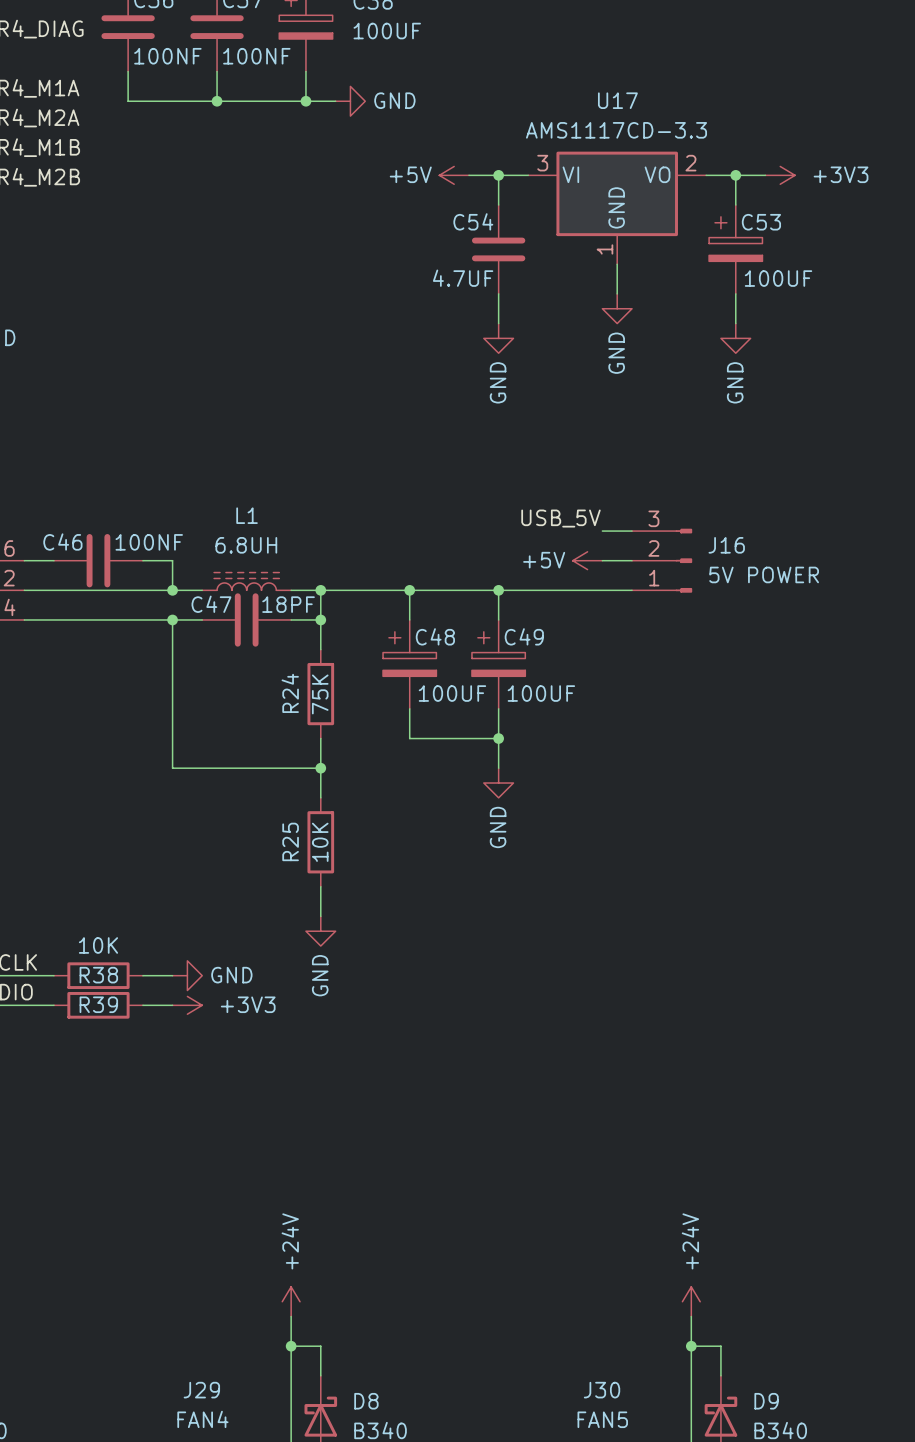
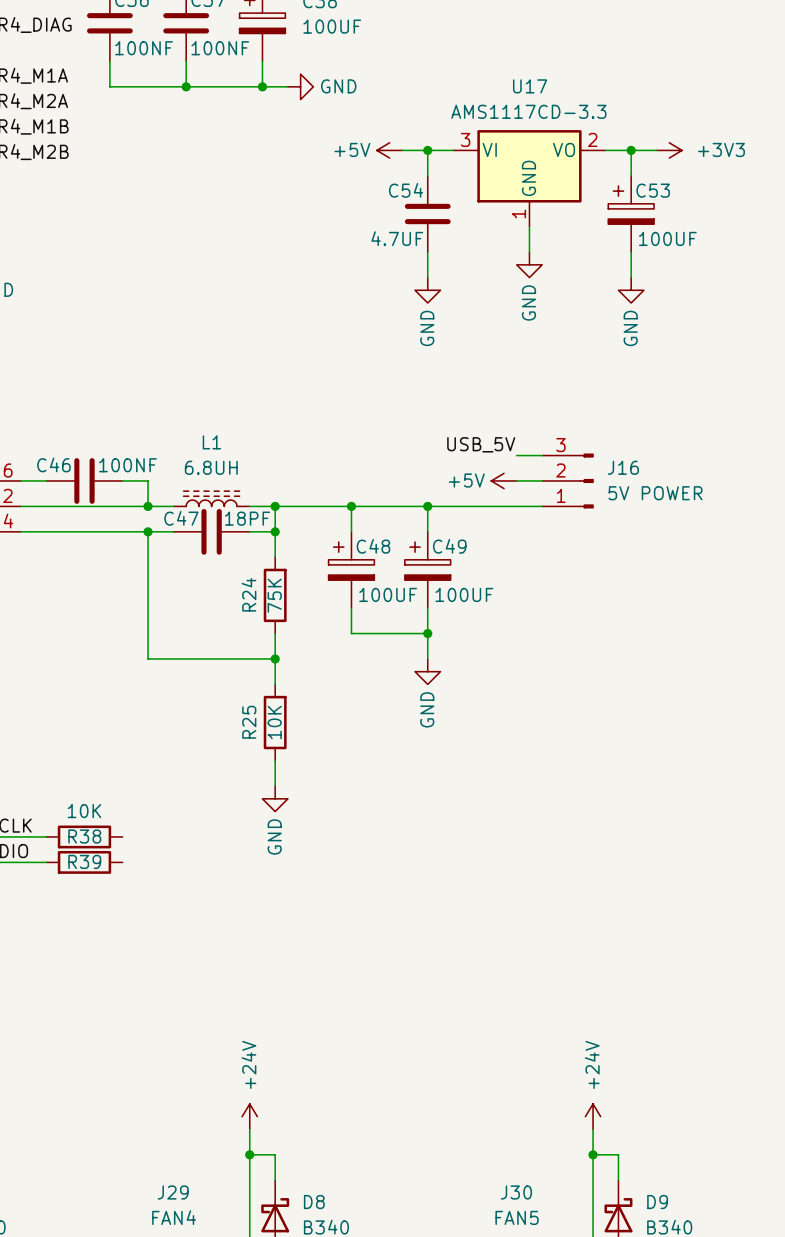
wire: (142, 975) (172, 975) -> none
power symbol: GND (187, 975) -> none
wire: (142, 1005) (172, 1005) -> none
power symbol: +3V3 (187, 1005) -> none

